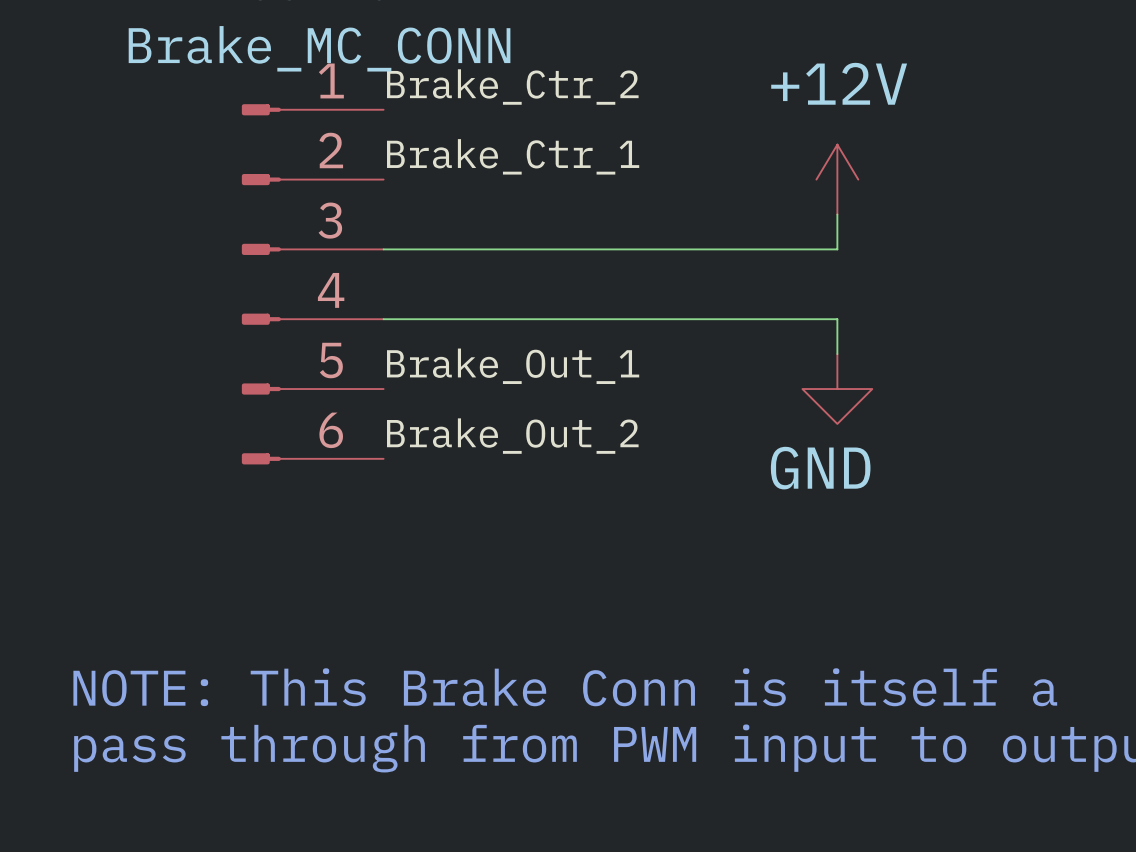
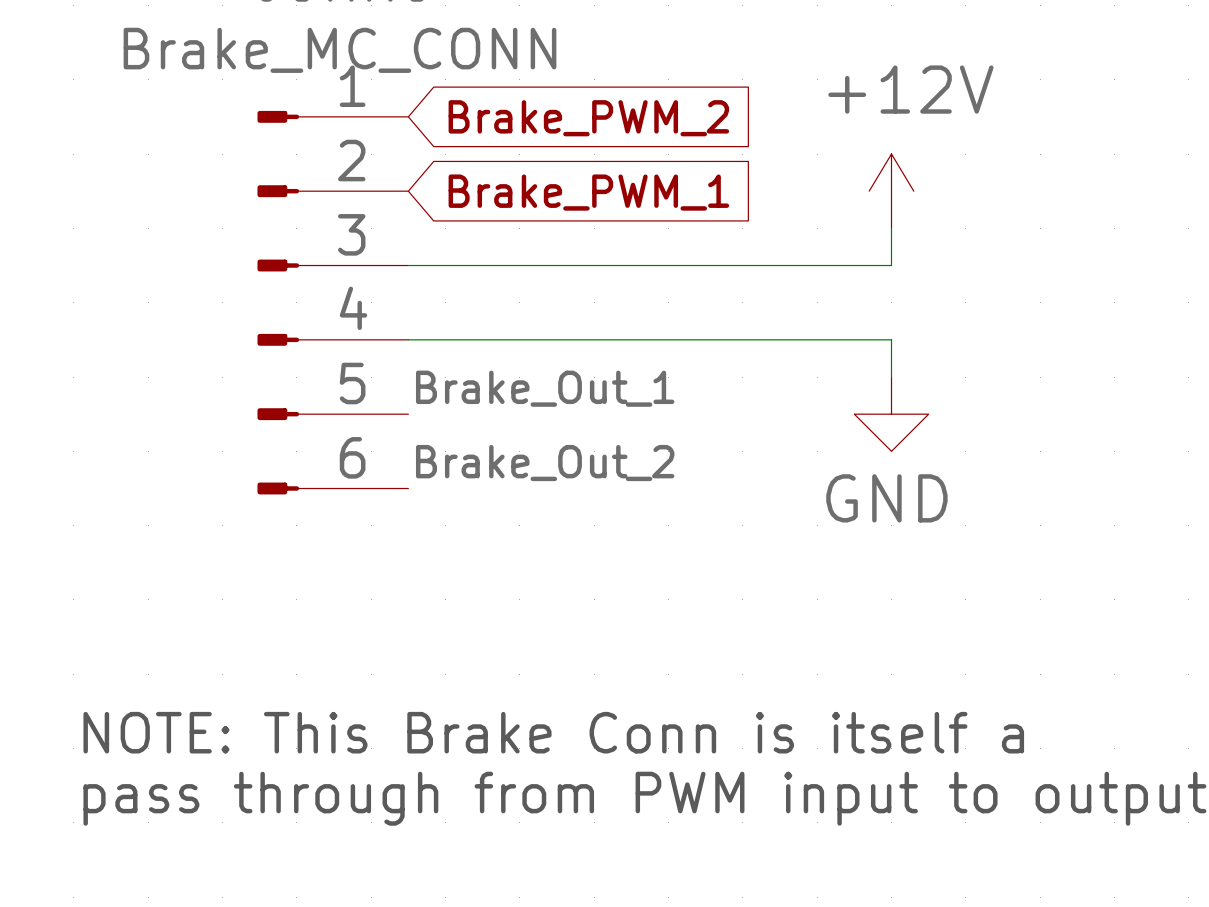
label: Brake_Ctr_2 (512, 87) -> none
global label: none -> Brake_PWM_2 (588, 118)
label: Brake_Ctr_1 (513, 156) -> none
global label: none -> Brake_PWM_1 (588, 192)

